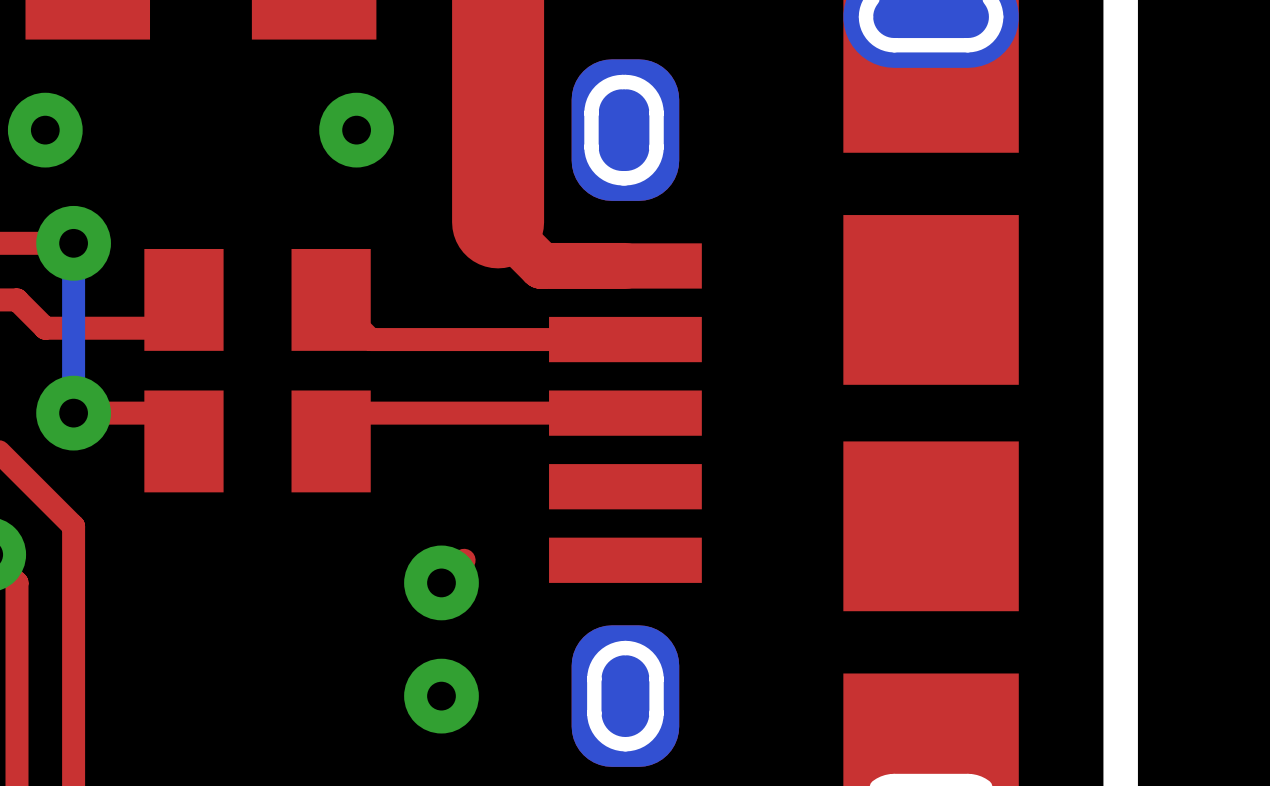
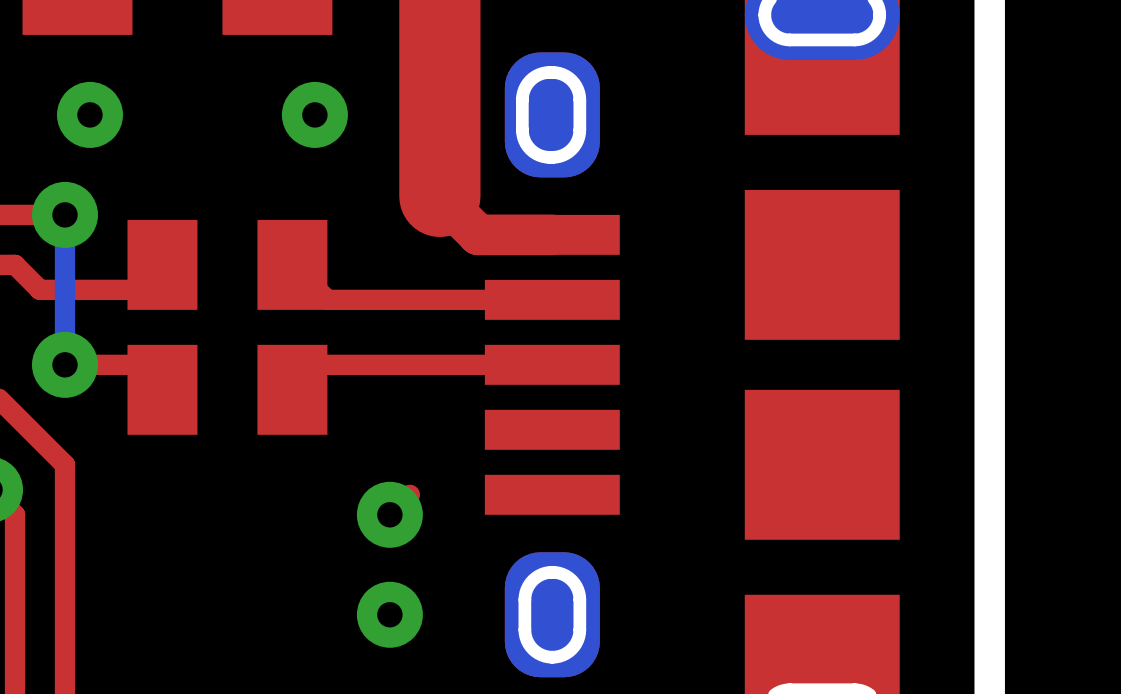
via position: (45, 130) -> (89, 114)

